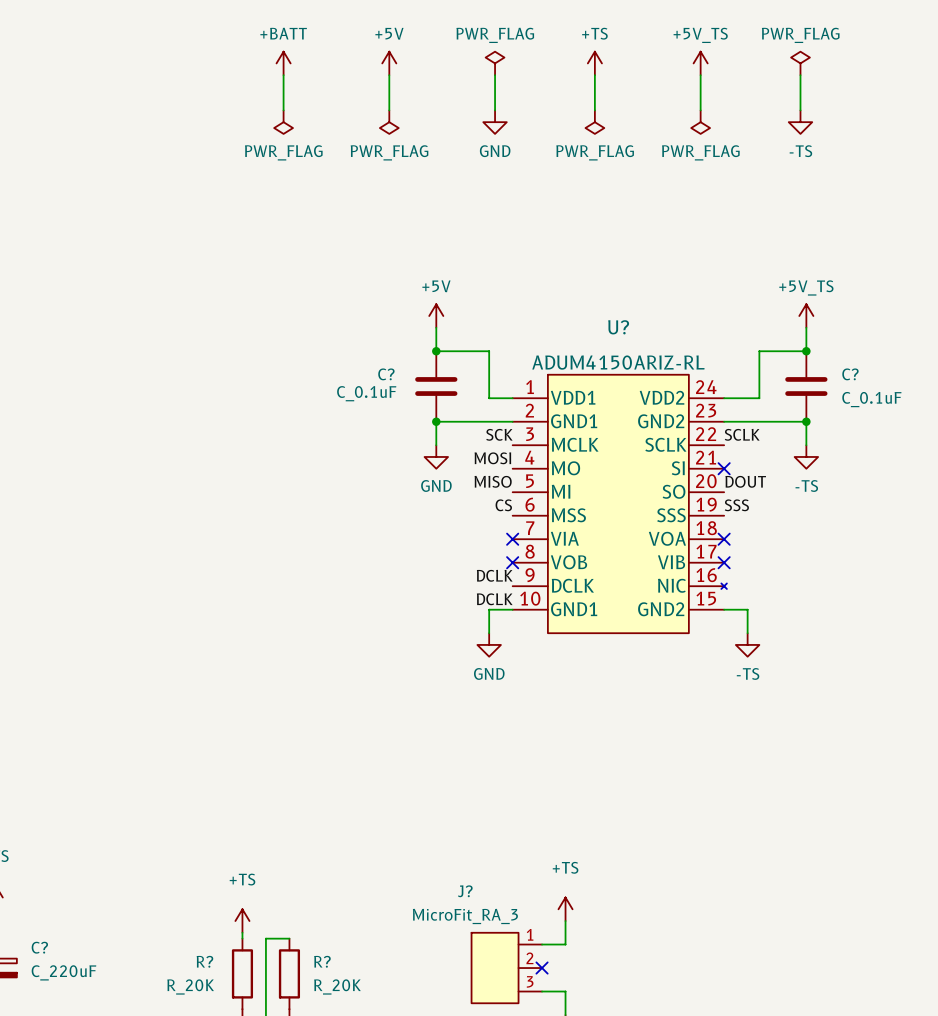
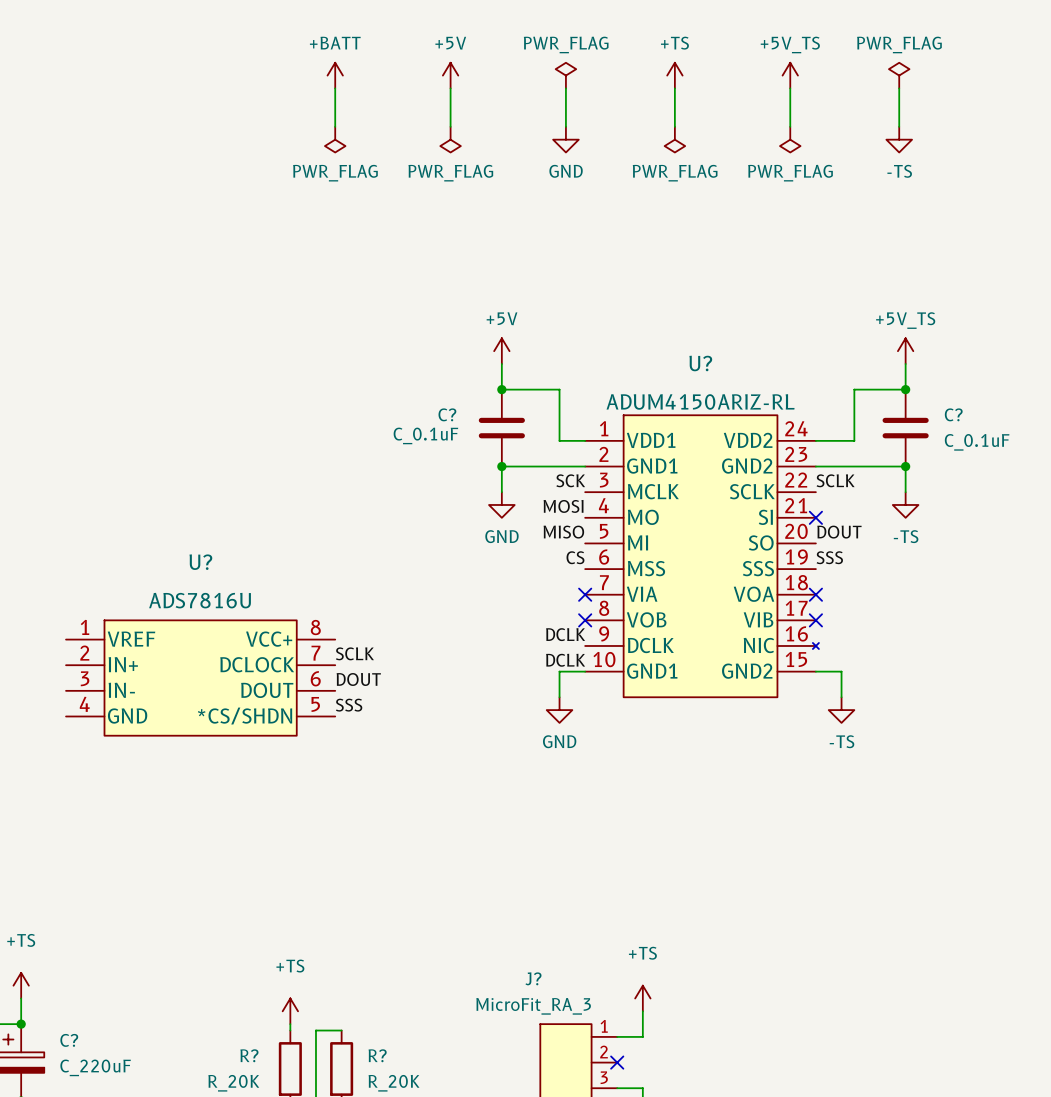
label: none -> SCLK (354, 653)
U?: none -> ADS7816U (200, 678)
label: none -> DOUT (358, 679)
label: none -> SSS (349, 705)

